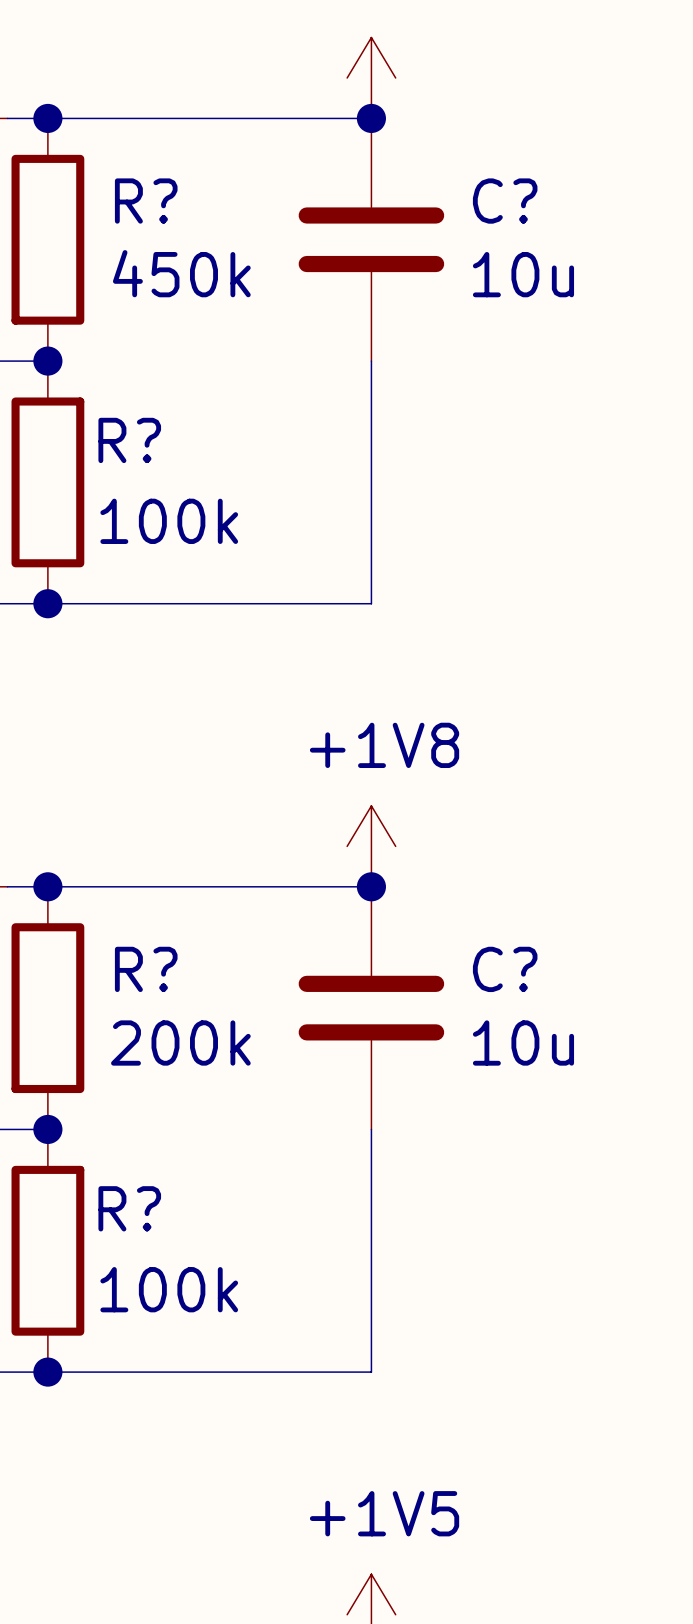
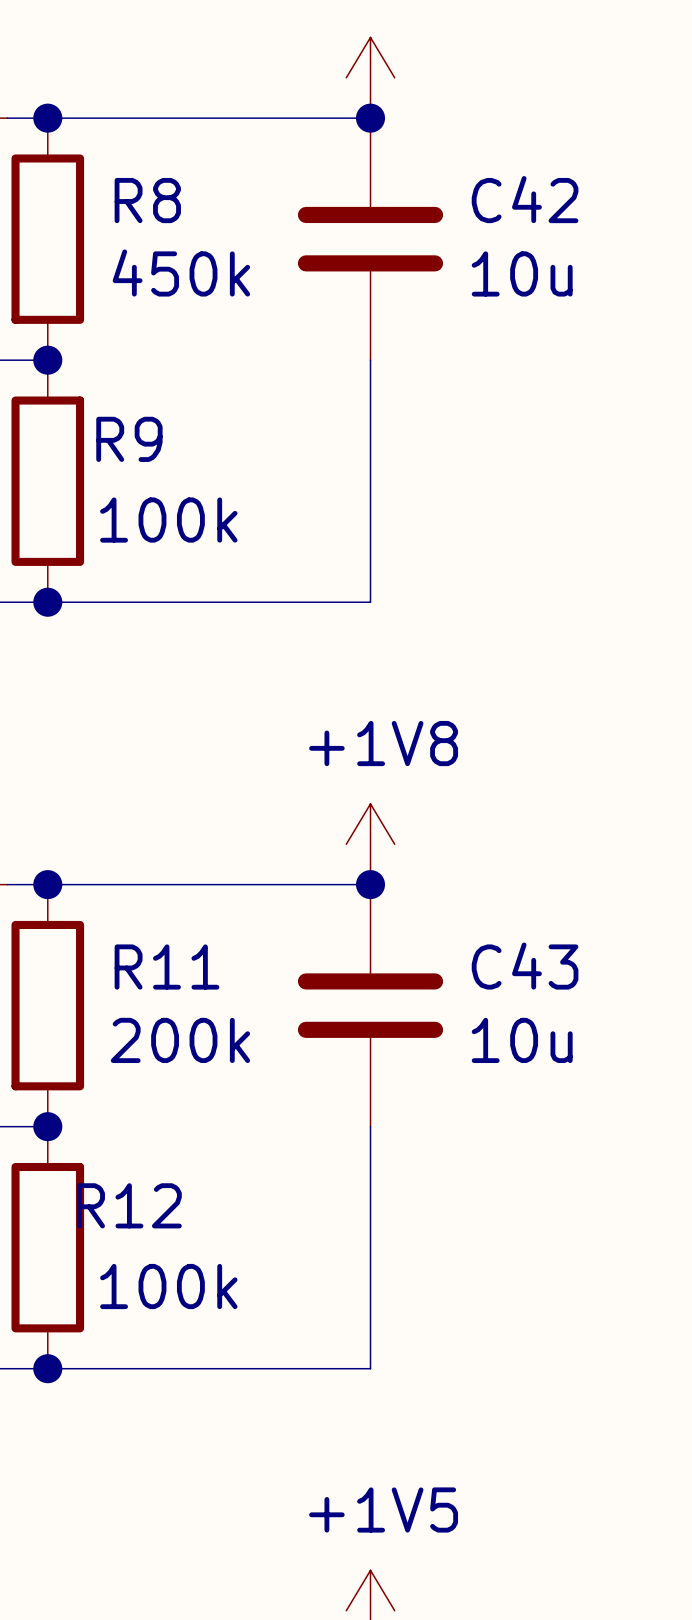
R? name: R? (146, 201) -> R8 (147, 200)
C? name: C? (505, 201) -> C42 (525, 199)
R? name: R? (129, 440) -> R9 (129, 439)
R? name: R? (146, 969) -> R11 (166, 967)
C? name: C? (505, 969) -> C43 (525, 966)
R? name: R? (129, 1208) -> R12 (129, 1205)

